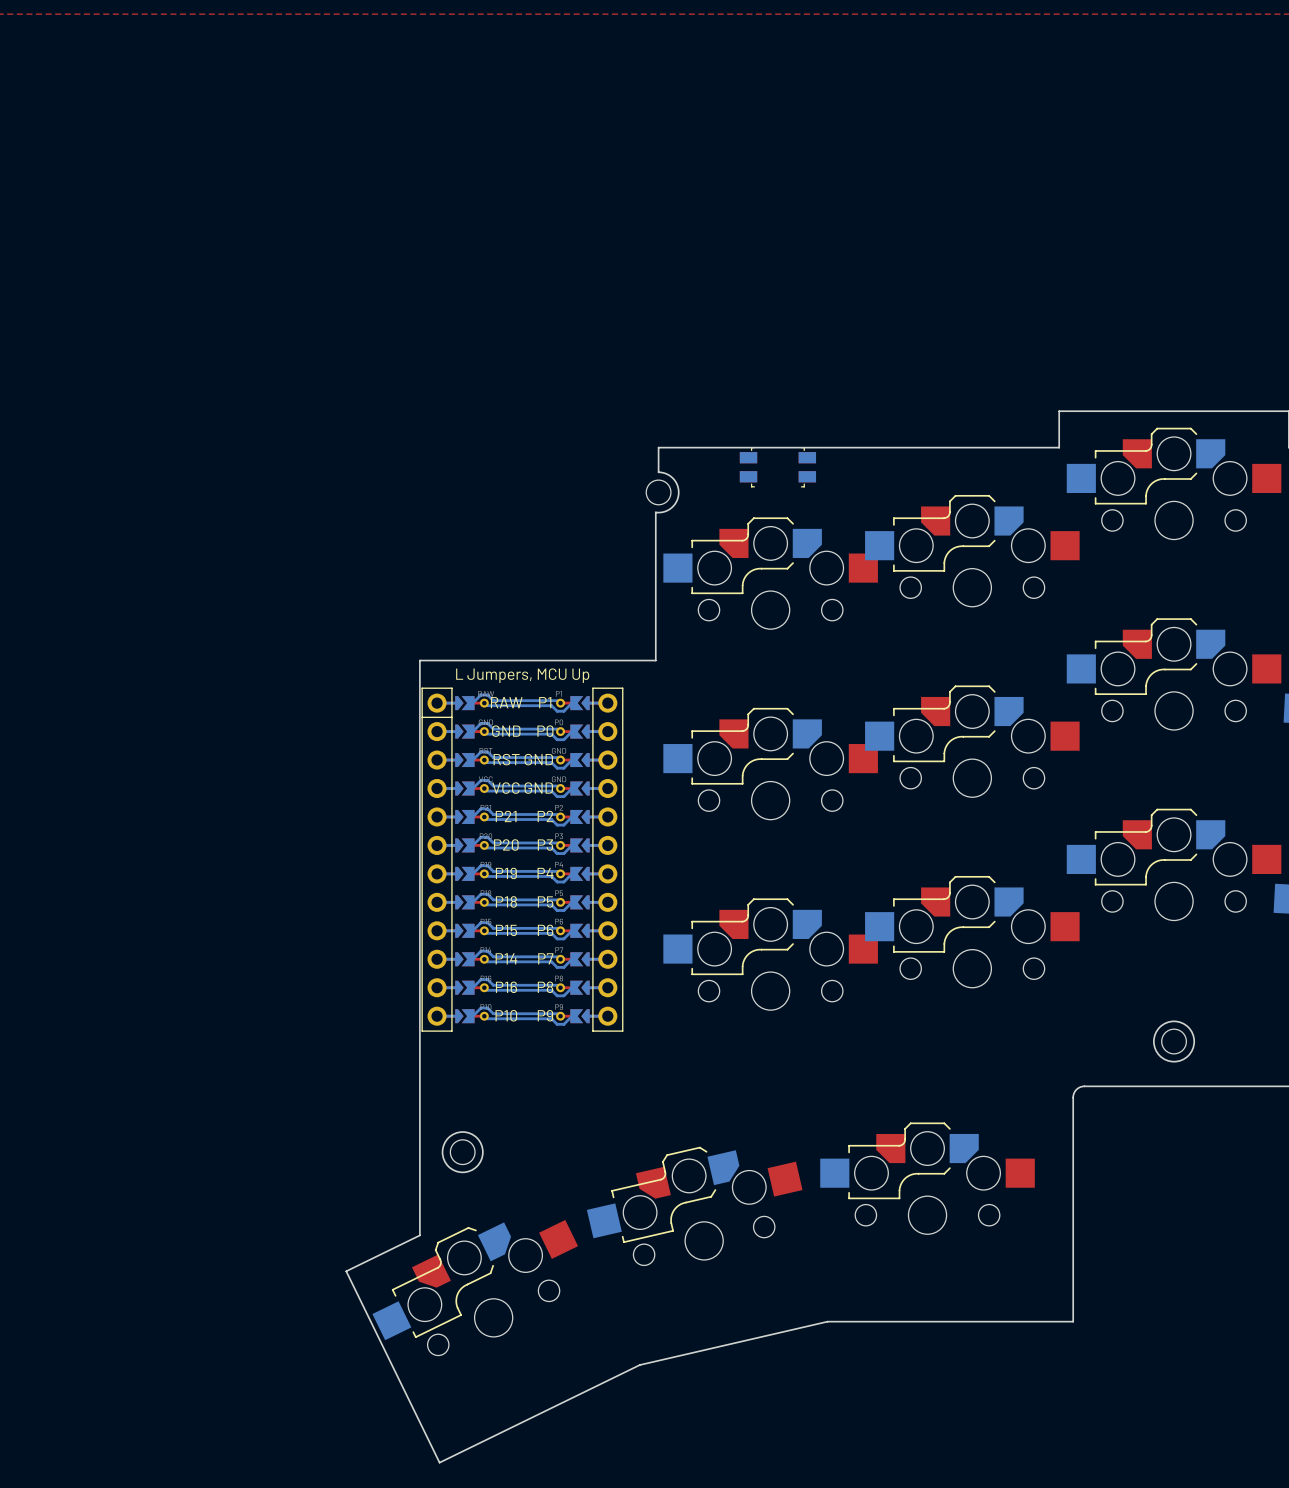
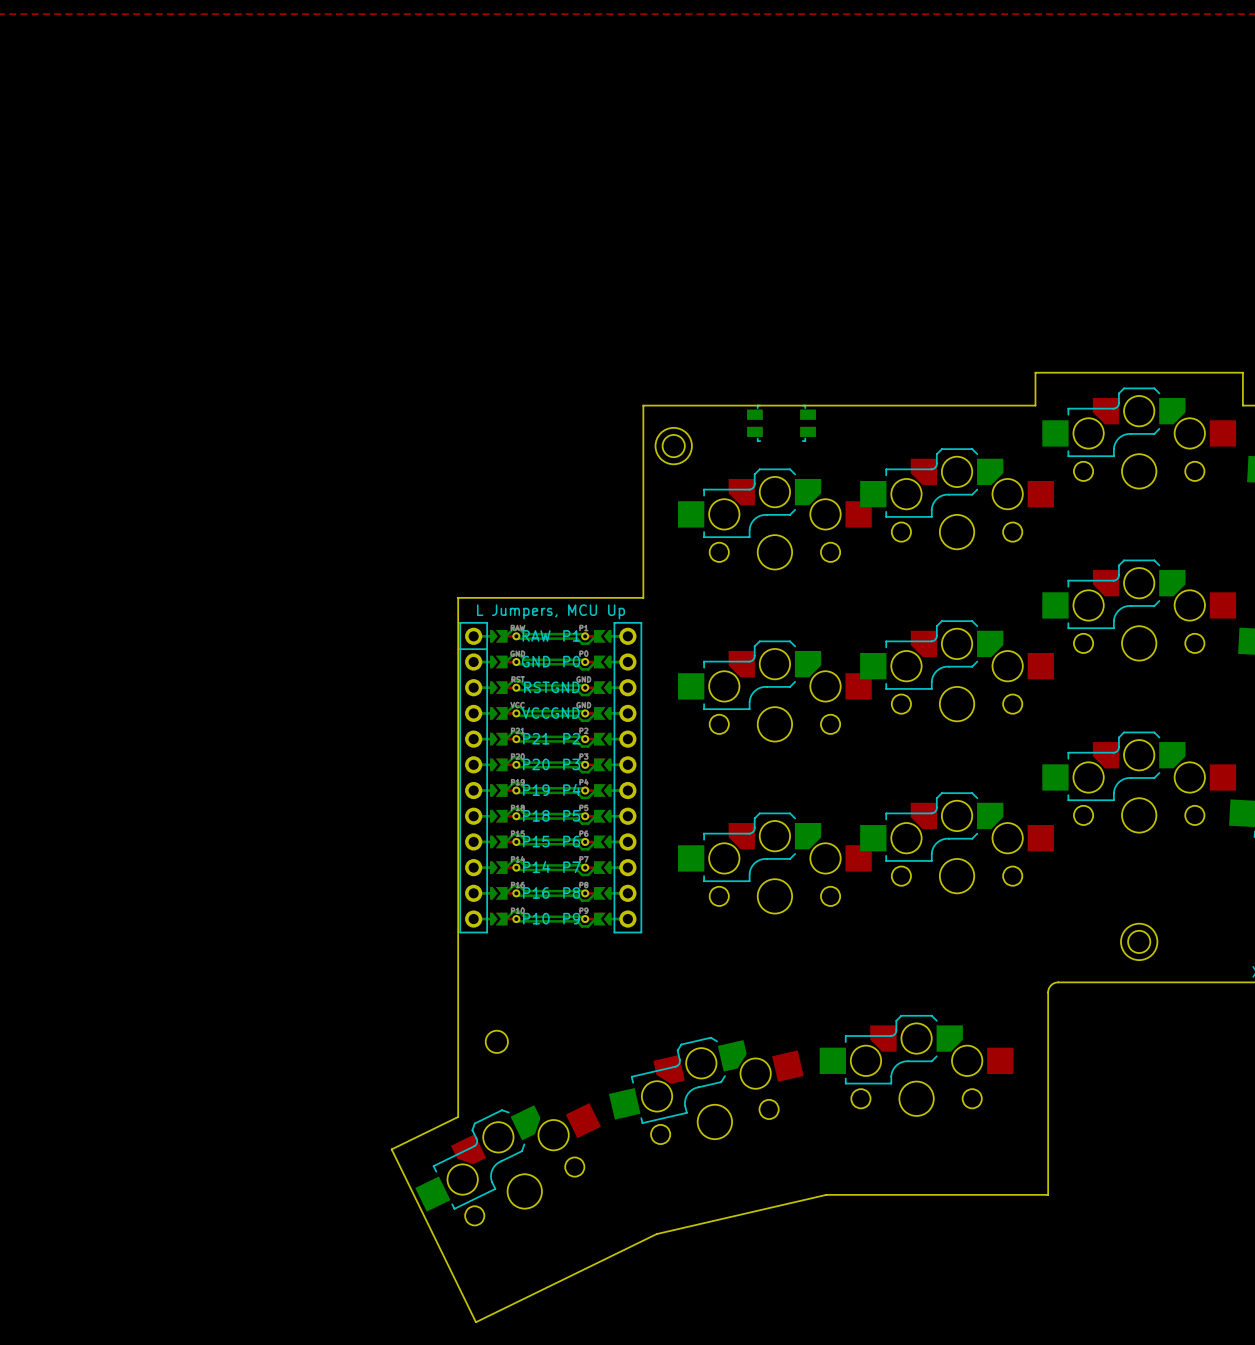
board edge: (658, 447) (658, 472) (672, 477) (677, 486) (678, 493) (676, 501) (670, 508) (655, 512) (655, 660) (624, 660) -> (673, 405) (643, 405) (643, 597)
round board edge: none -> [654, 427, 693, 466]
round board edge: [441, 1131, 484, 1174] -> none

